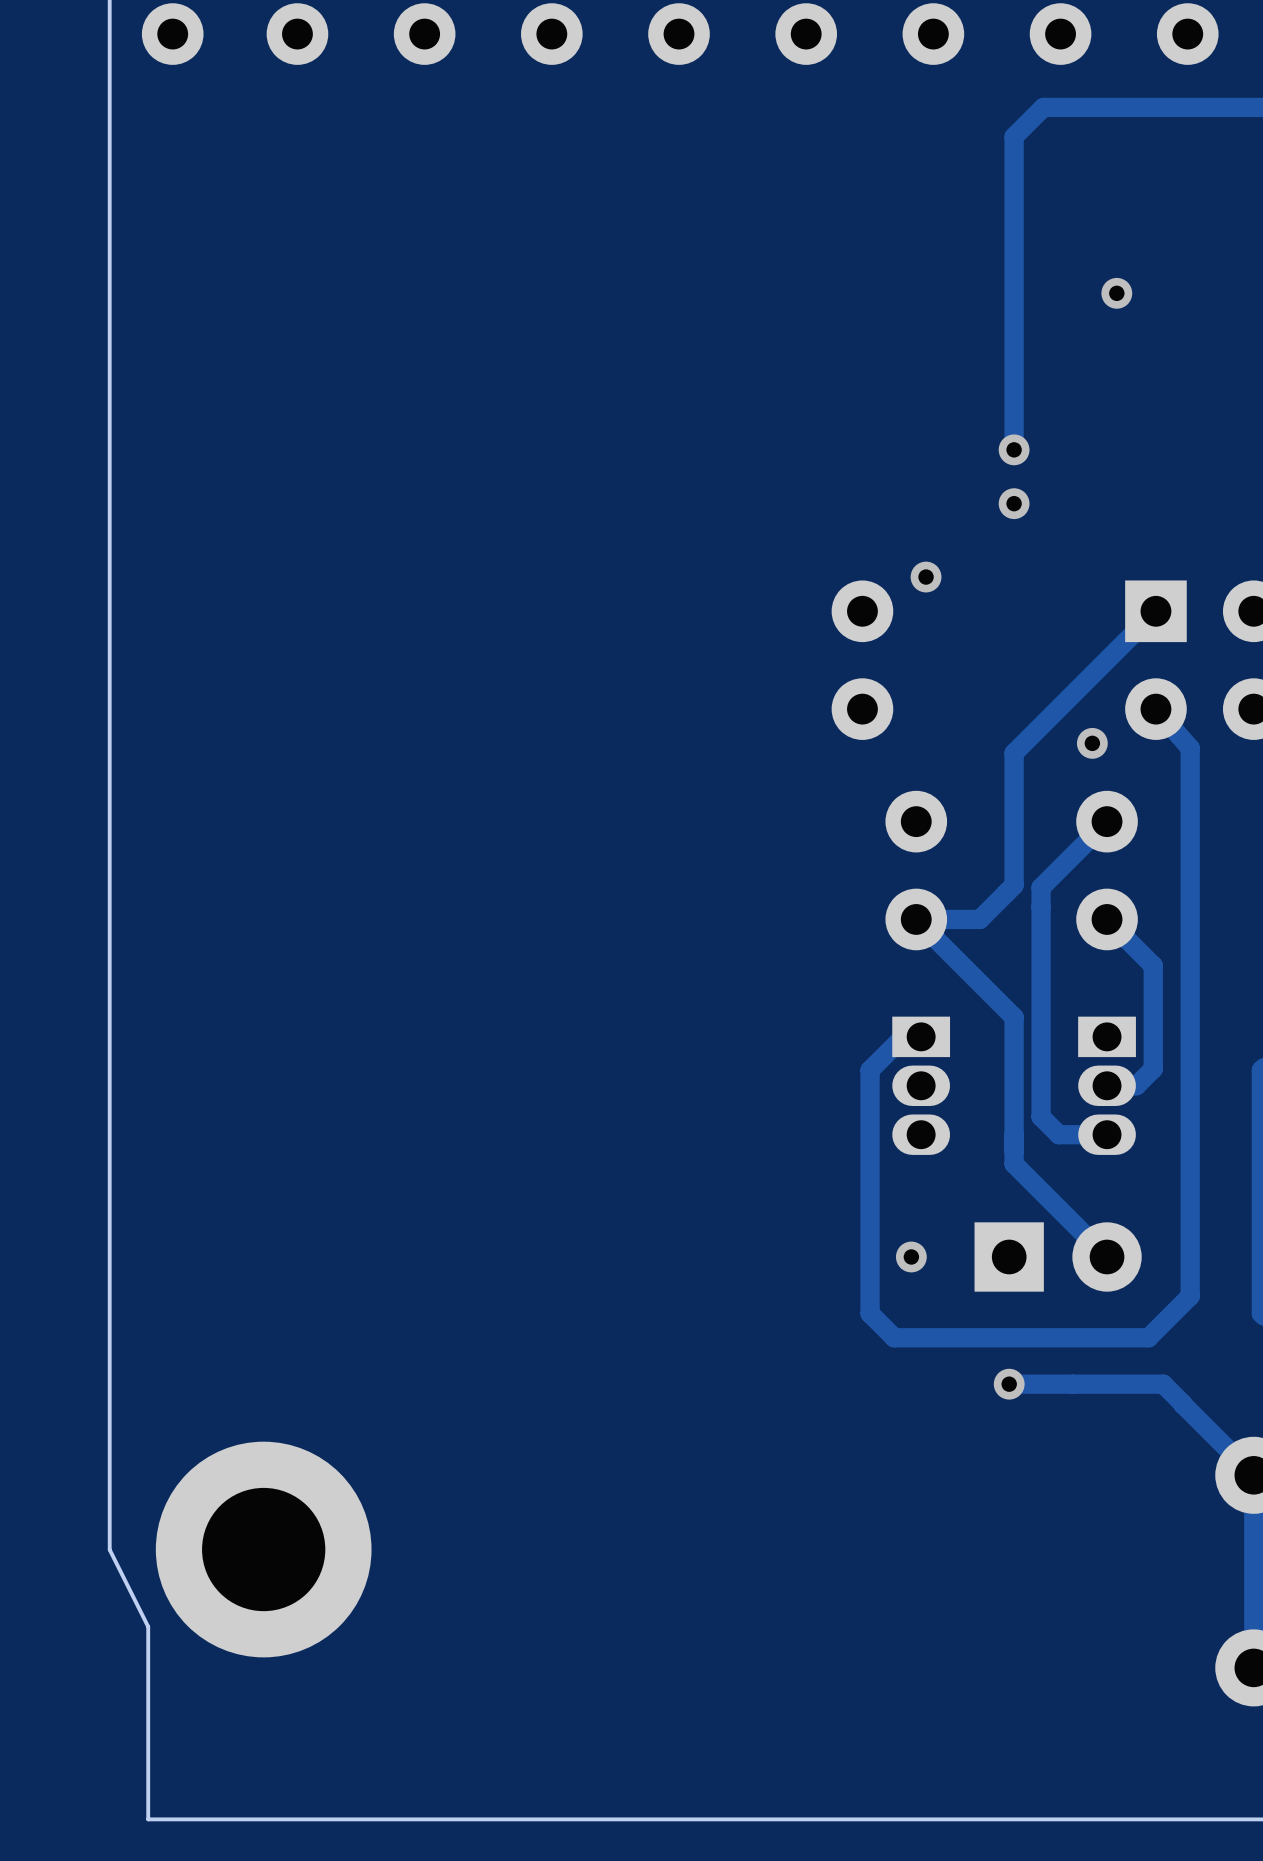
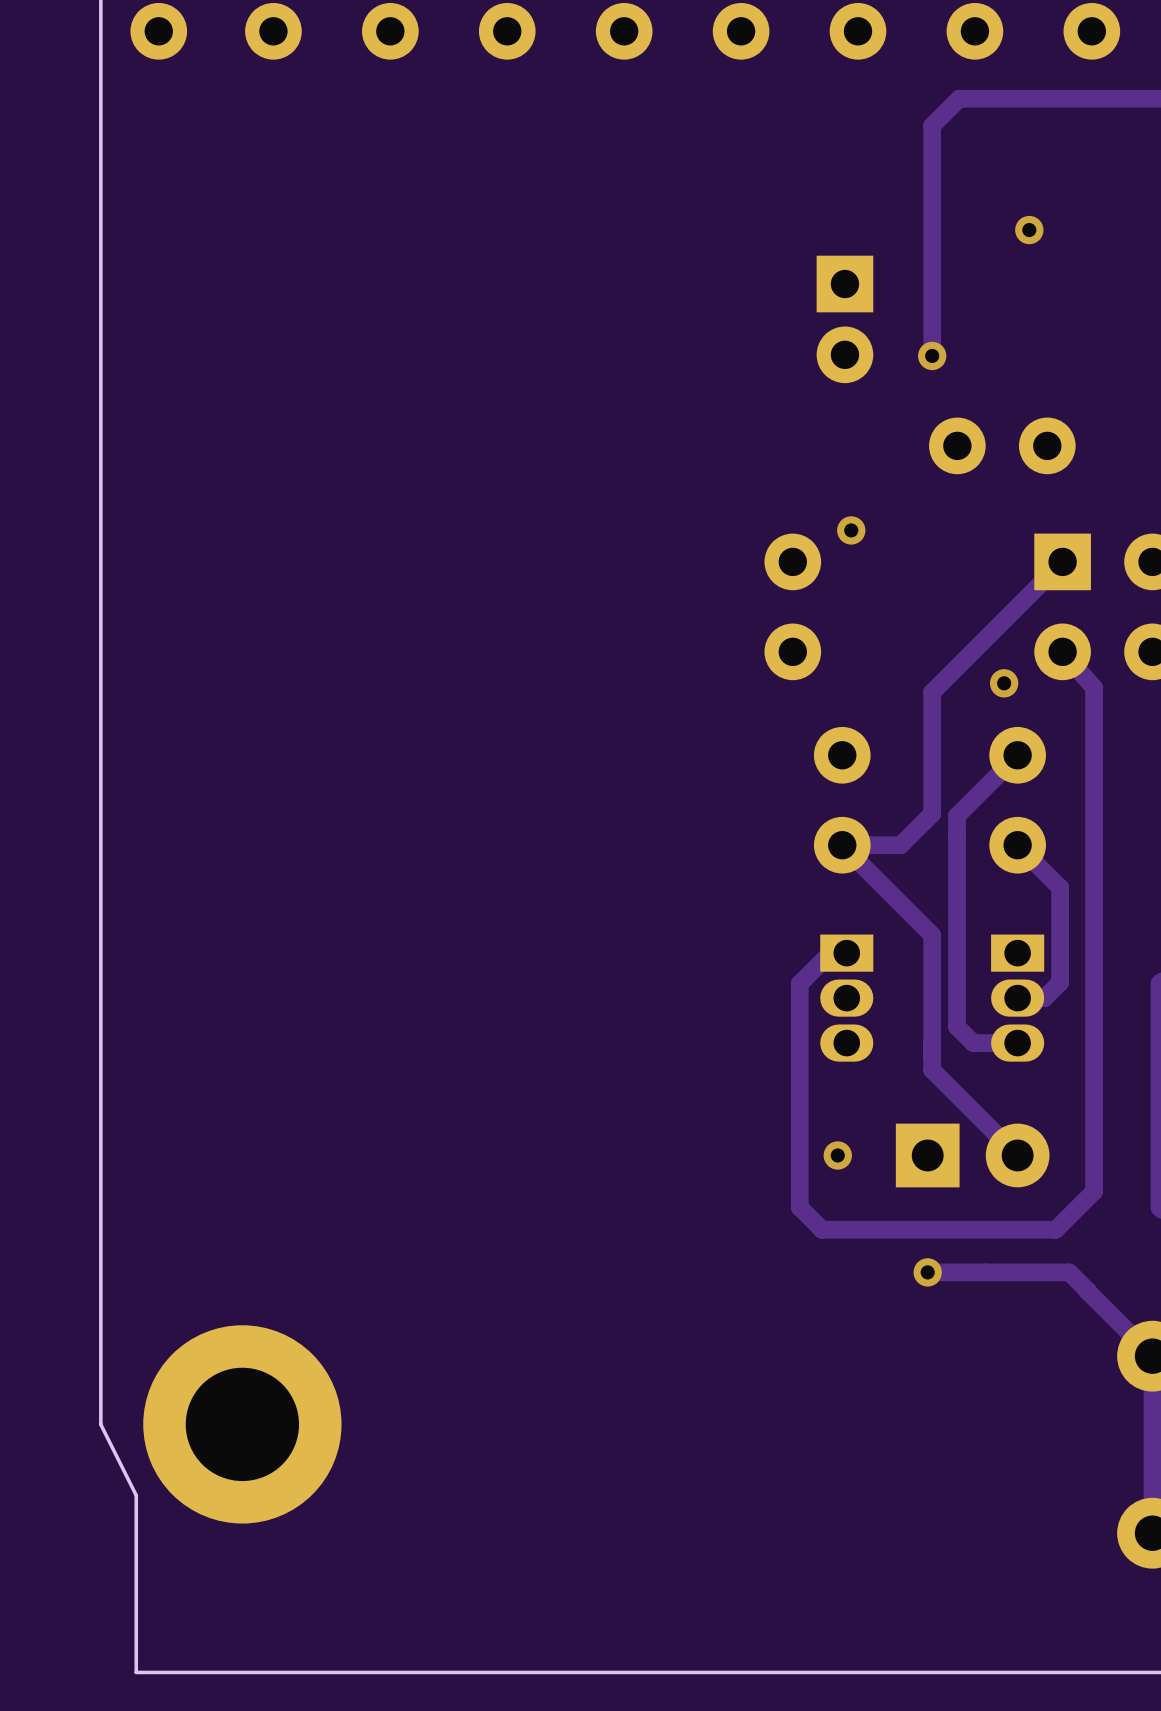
via position: (1116, 293) -> (1029, 230)
part: none -> (844, 319)
track: (1014, 387) (1014, 449) -> none
via: none -> (932, 355)
via: (1014, 449) -> none
part: none -> (1002, 445)
via: (1014, 503) -> none

